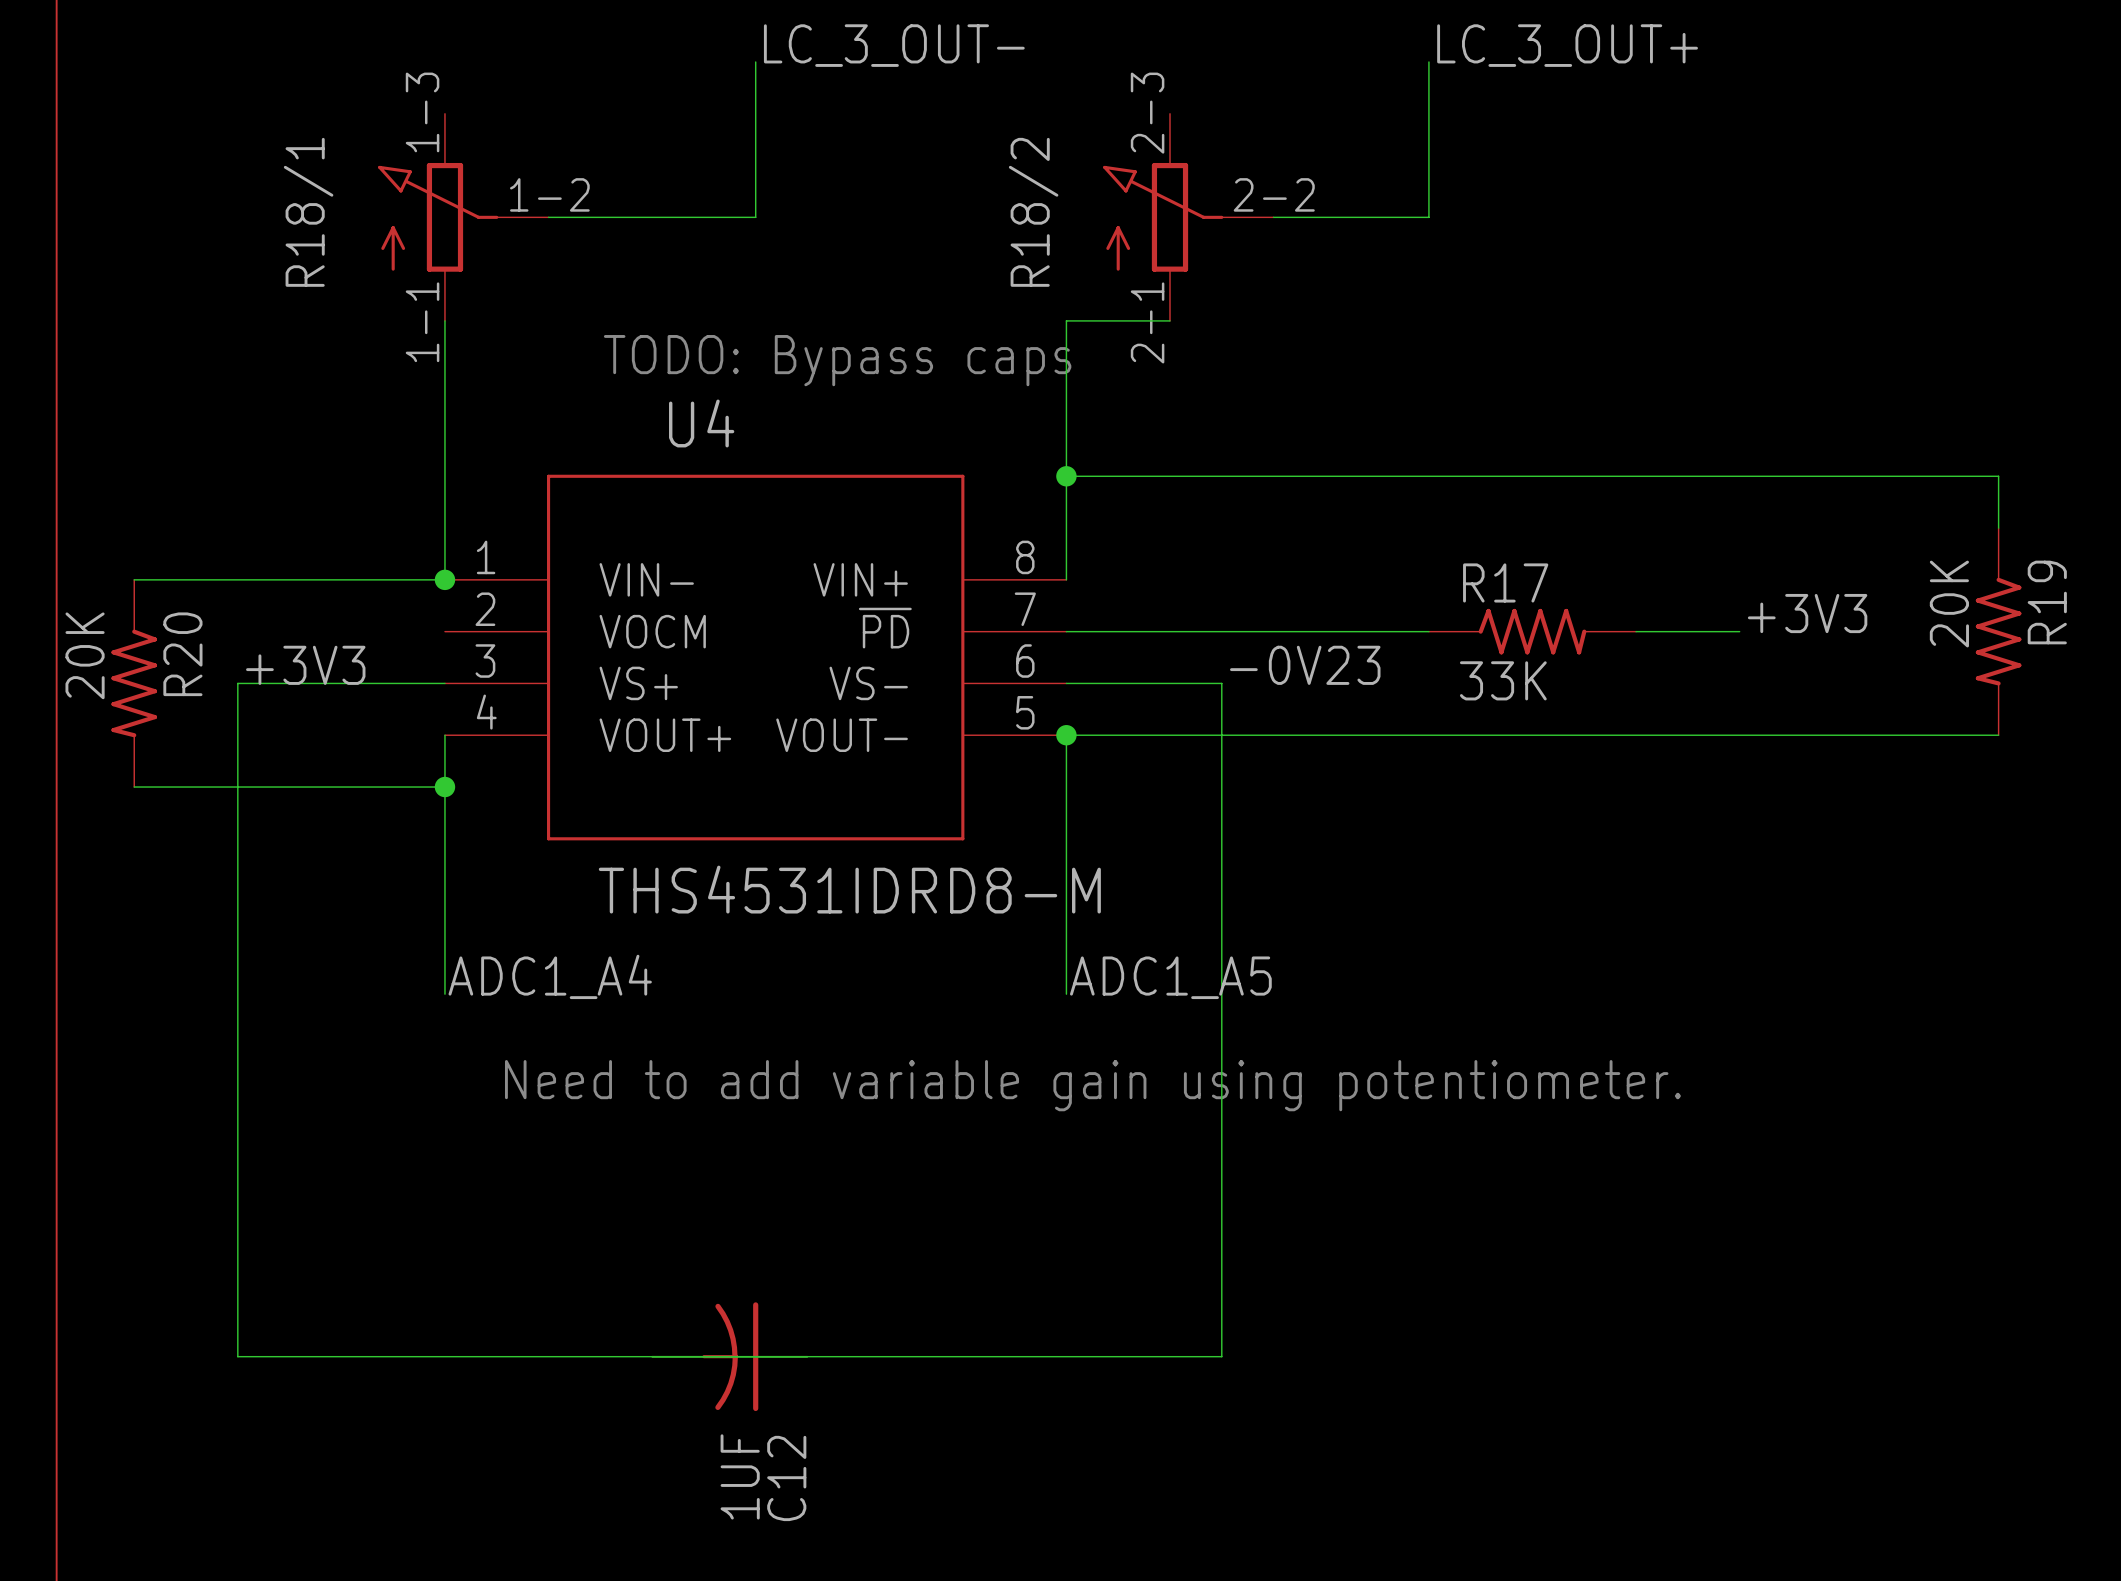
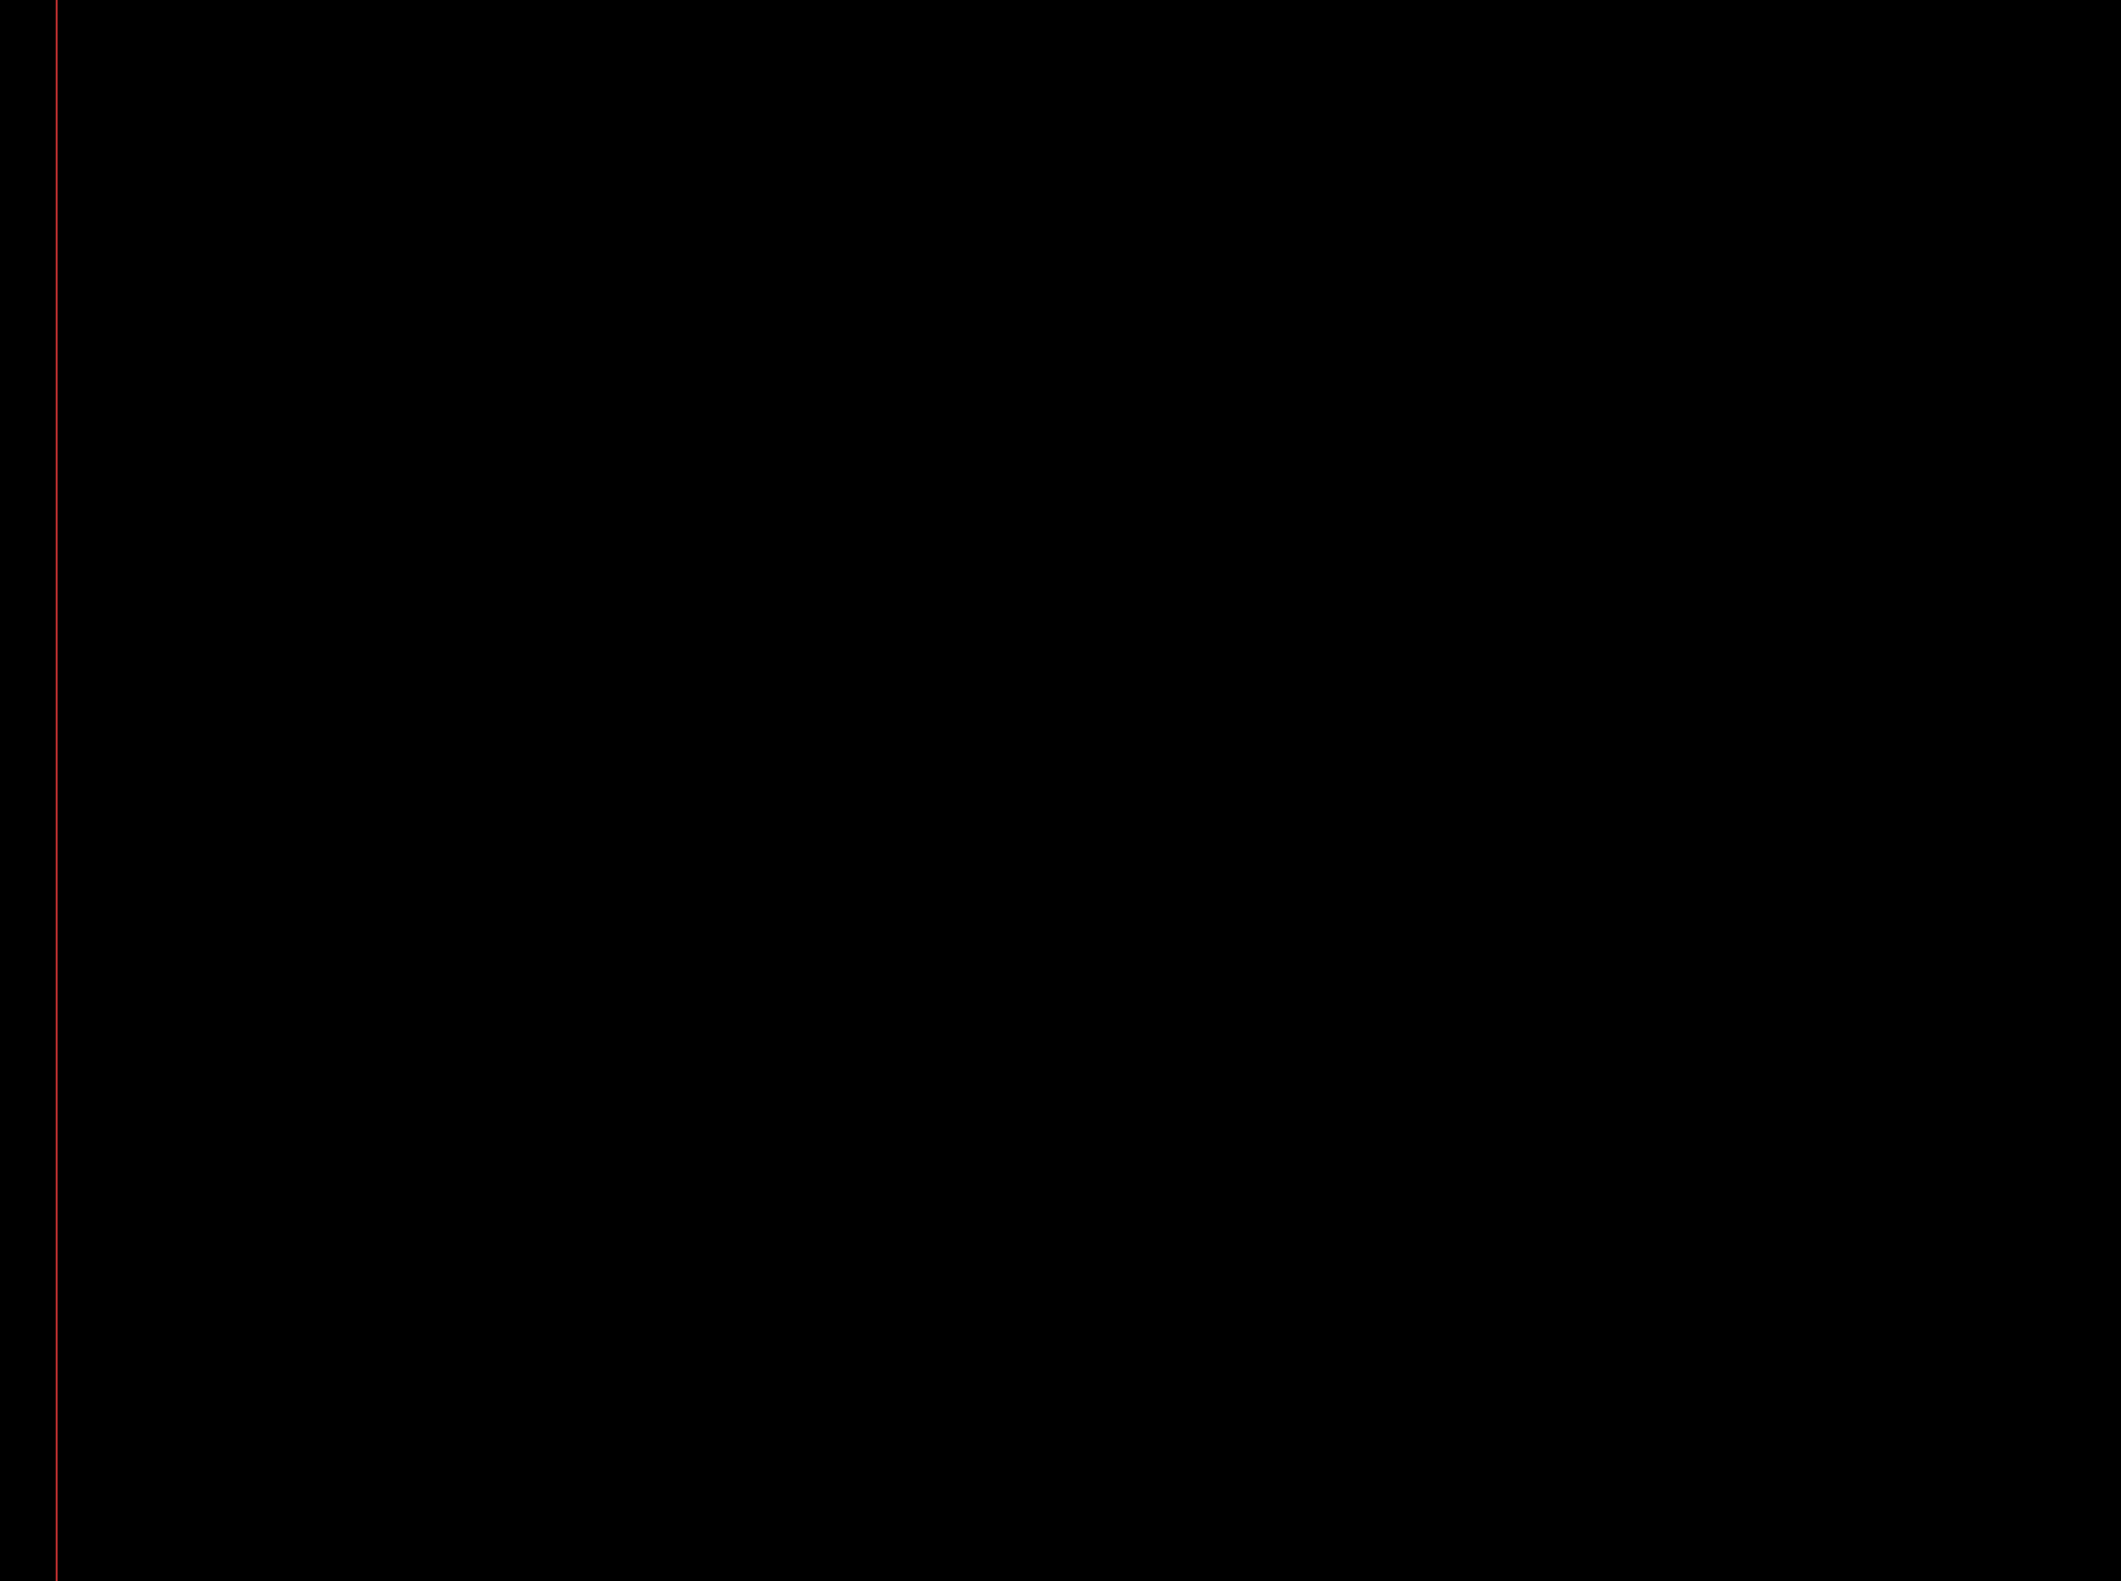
label: LC_3_OUT- (894, 45) -> none
label: LC_3_OUT+ (1567, 45) -> none
wire: (755, 61) (755, 217) (548, 217) -> none
wire: (1428, 61) (1428, 217) (1273, 217) -> none
R18/1: (463, 217) -> none
R18/2: (1188, 217) -> none
wire: (444, 320) (444, 579) (134, 579) -> none
wire: (1170, 320) (1066, 320) (1066, 579) -> none
text: TODO: Bypass caps (837, 360) -> none
wire: (1066, 476) (1998, 476) (1998, 528) -> none
junction: (1066, 476) -> none
junction: (444, 579) -> none
label: +3V3 (1807, 613) -> none
wire: (1066, 631) (1428, 631) -> none
R17: 33K (1532, 631) -> none
wire: (1636, 631) (1739, 631) -> none
R19: 20K (1998, 631) -> none
U4: THS4531IDRD8-M (755, 657) -> none
label: +3V3 (305, 665) -> none
label: -0V23 (1305, 665) -> none
R20: 20K (134, 683) -> none
wire: (444, 683) (237, 683) (237, 1356) (1221, 1356) (1221, 683) (1066, 683) -> none
wire: (444, 735) (444, 994) -> none
junction: (1066, 735) -> none
wire: (1998, 735) (1066, 735) (1066, 994) -> none
wire: (134, 787) (444, 787) -> none
junction: (444, 787) -> none
label: ADC1_A4 (550, 976) -> none
label: ADC1_A5 (1170, 977) -> none
text: Need to add variable gain using potentiometer. (1092, 1085) -> none
C12: 1UF (729, 1356) -> none

